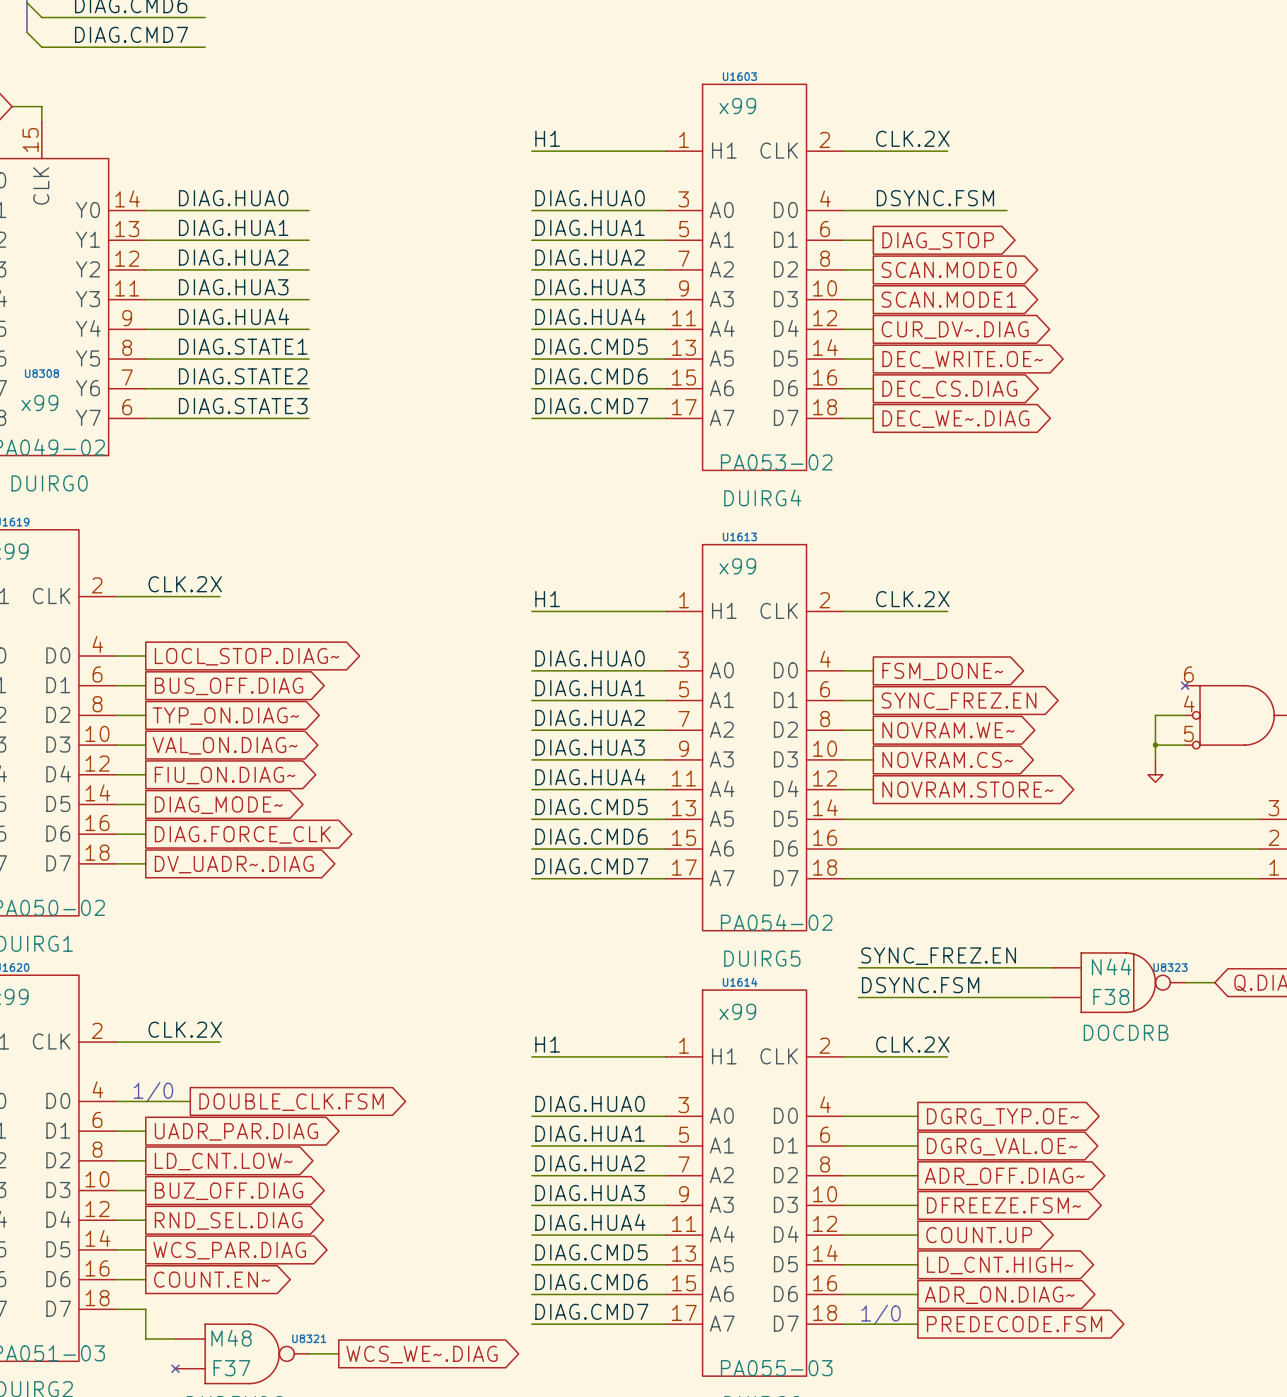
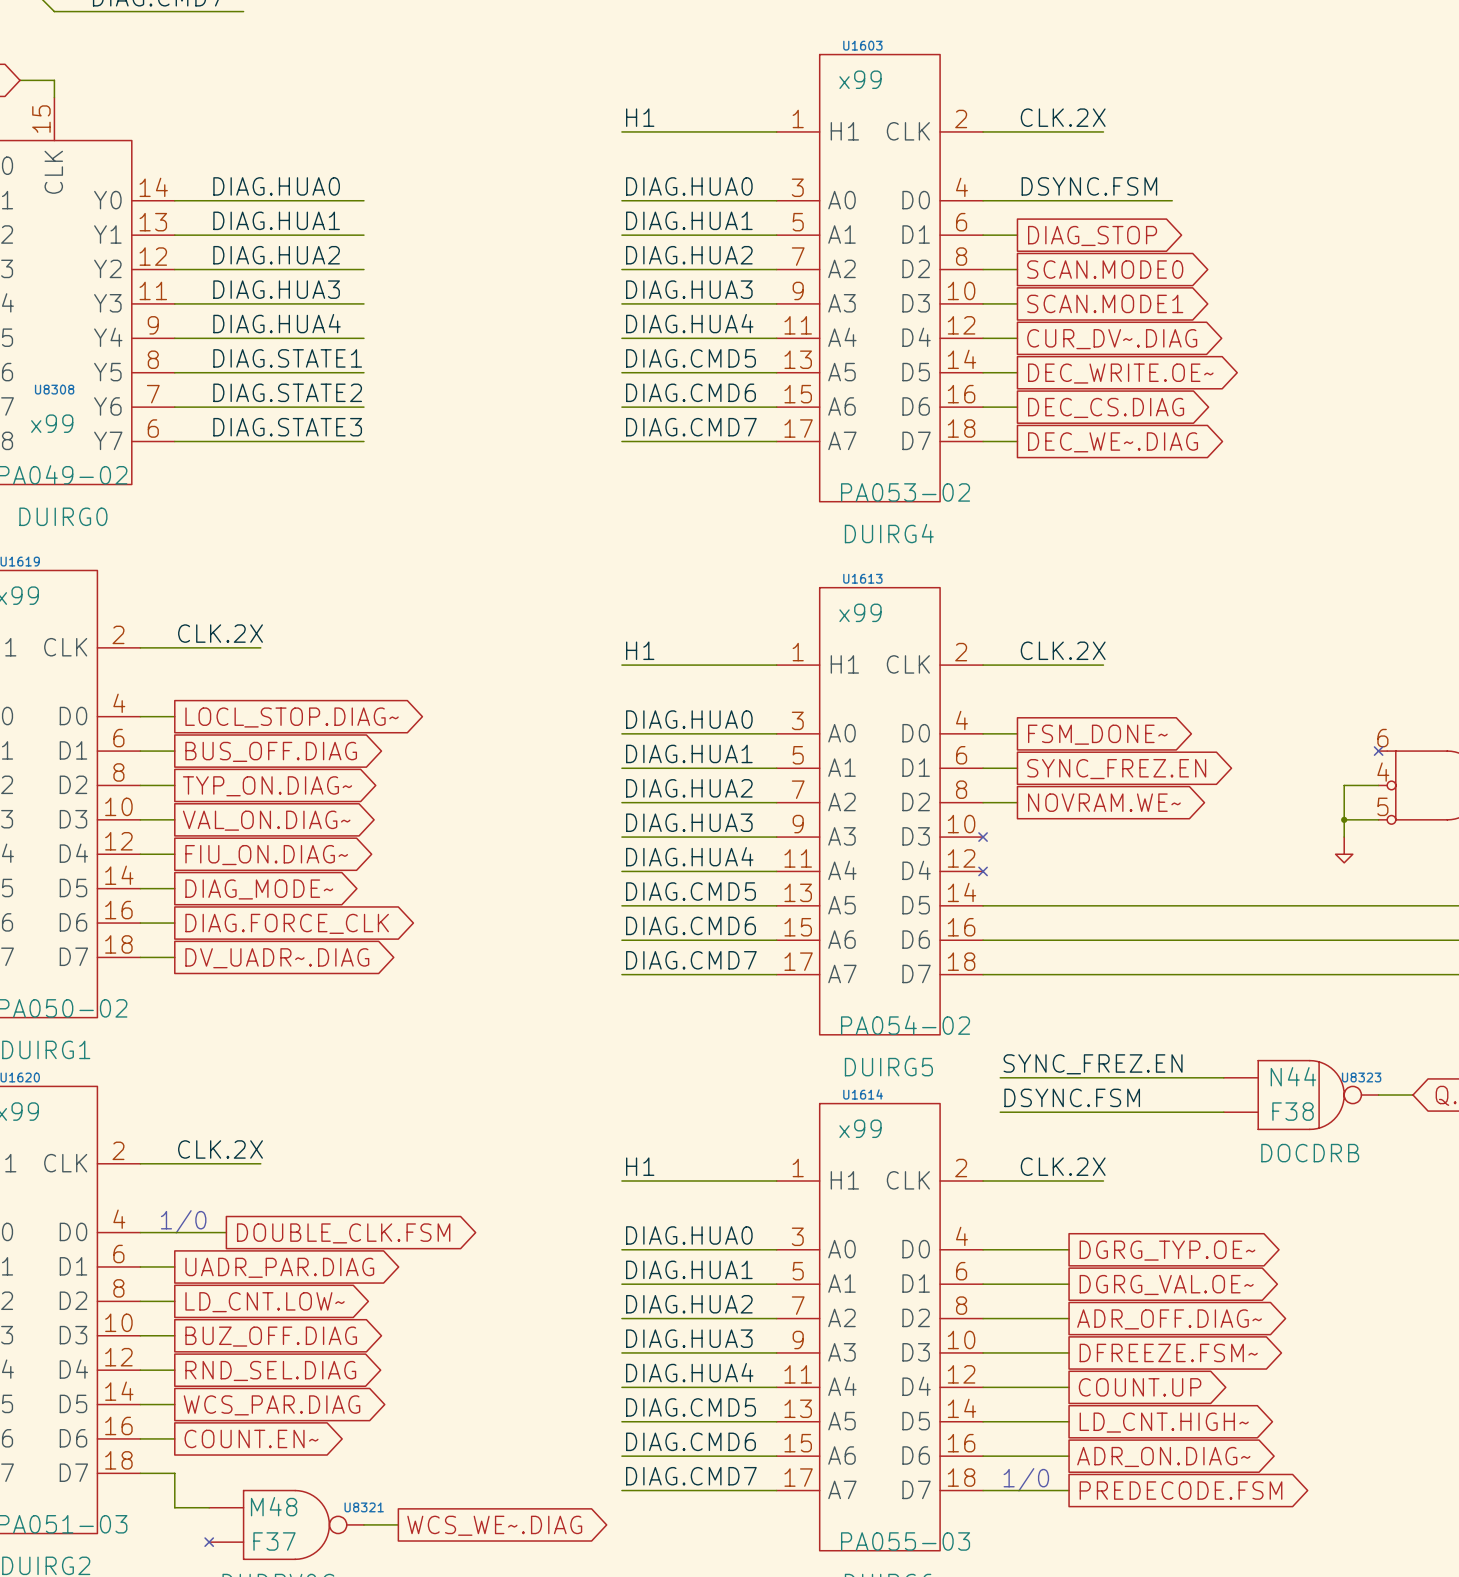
wire: (843, 759) (873, 759) -> none
no-connect mark: none -> (983, 837)
global label: NOVRAM.CS~ (947, 759) -> none
wire: (843, 789) (873, 789) -> none
no-connect mark: none -> (983, 871)
global label: NOVRAM.STORE~ (967, 789) -> none

